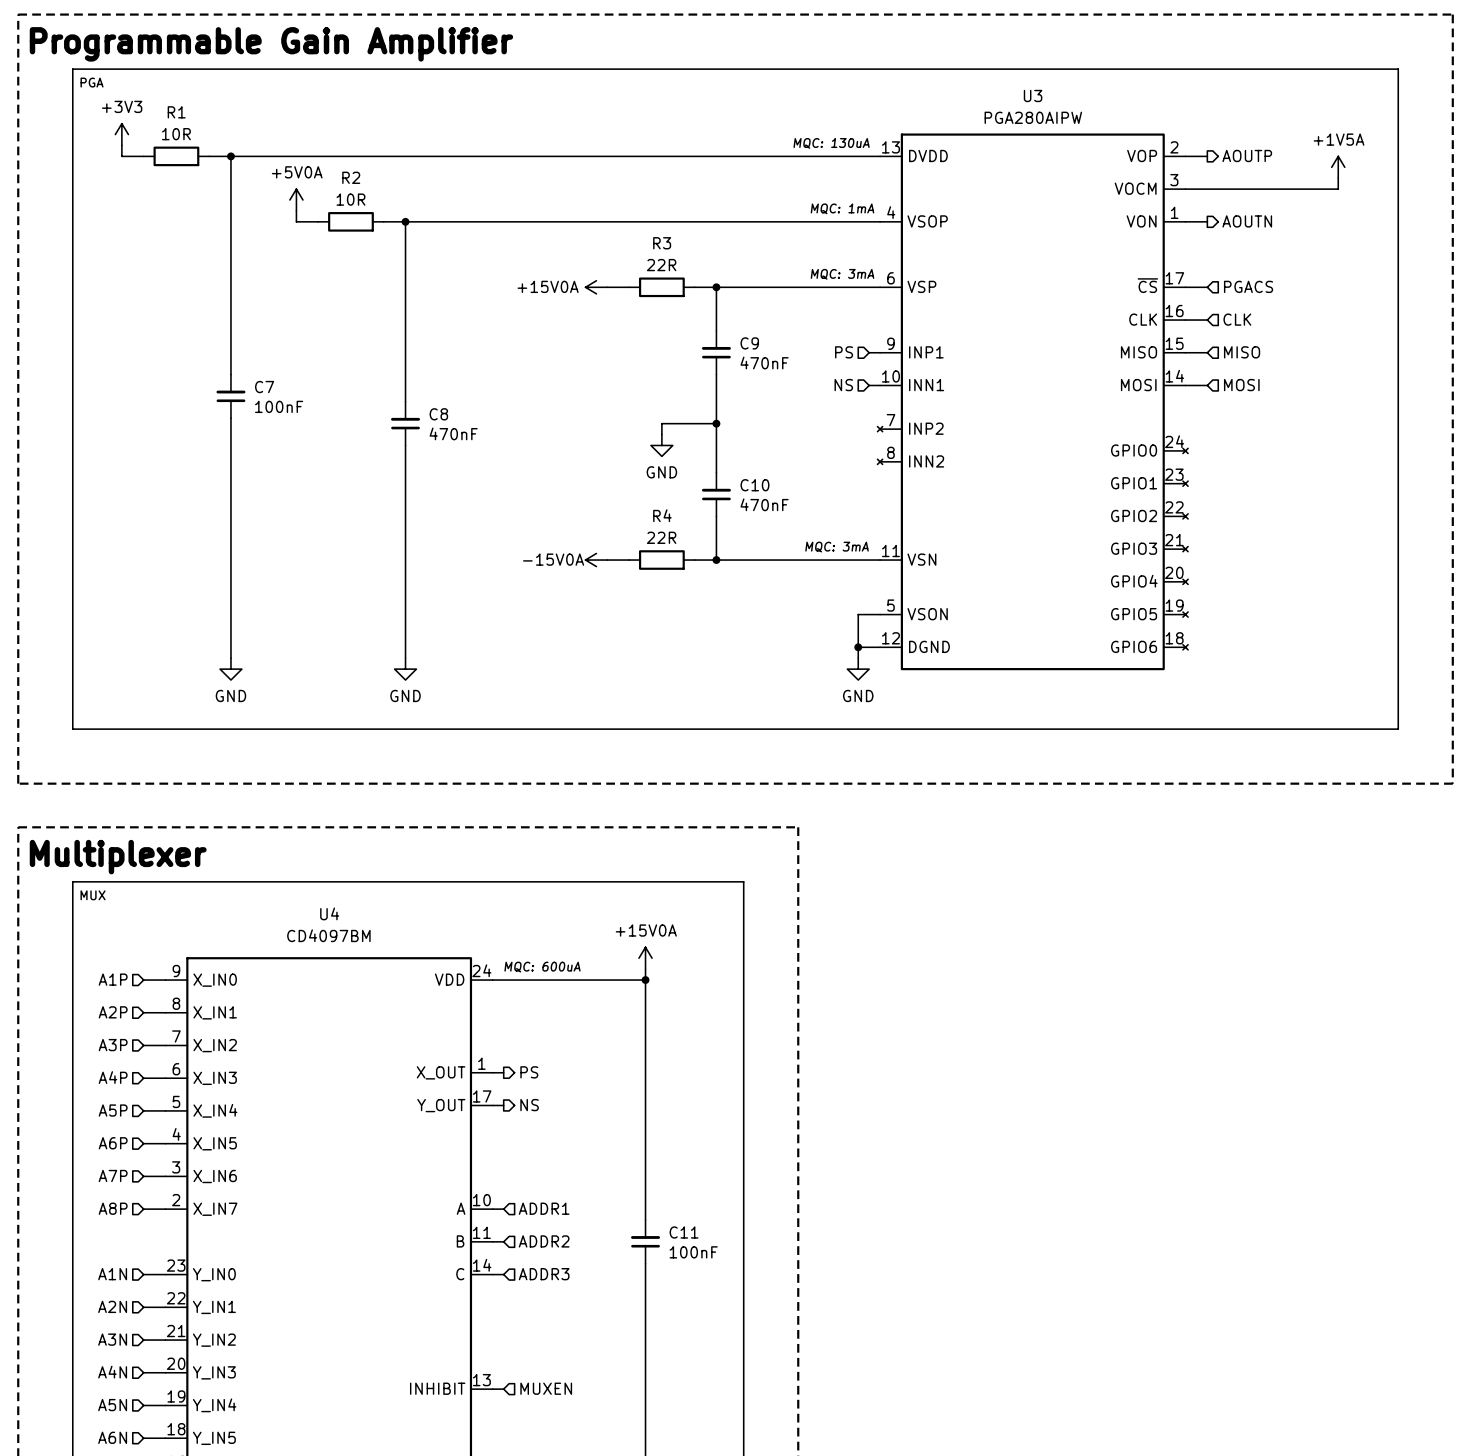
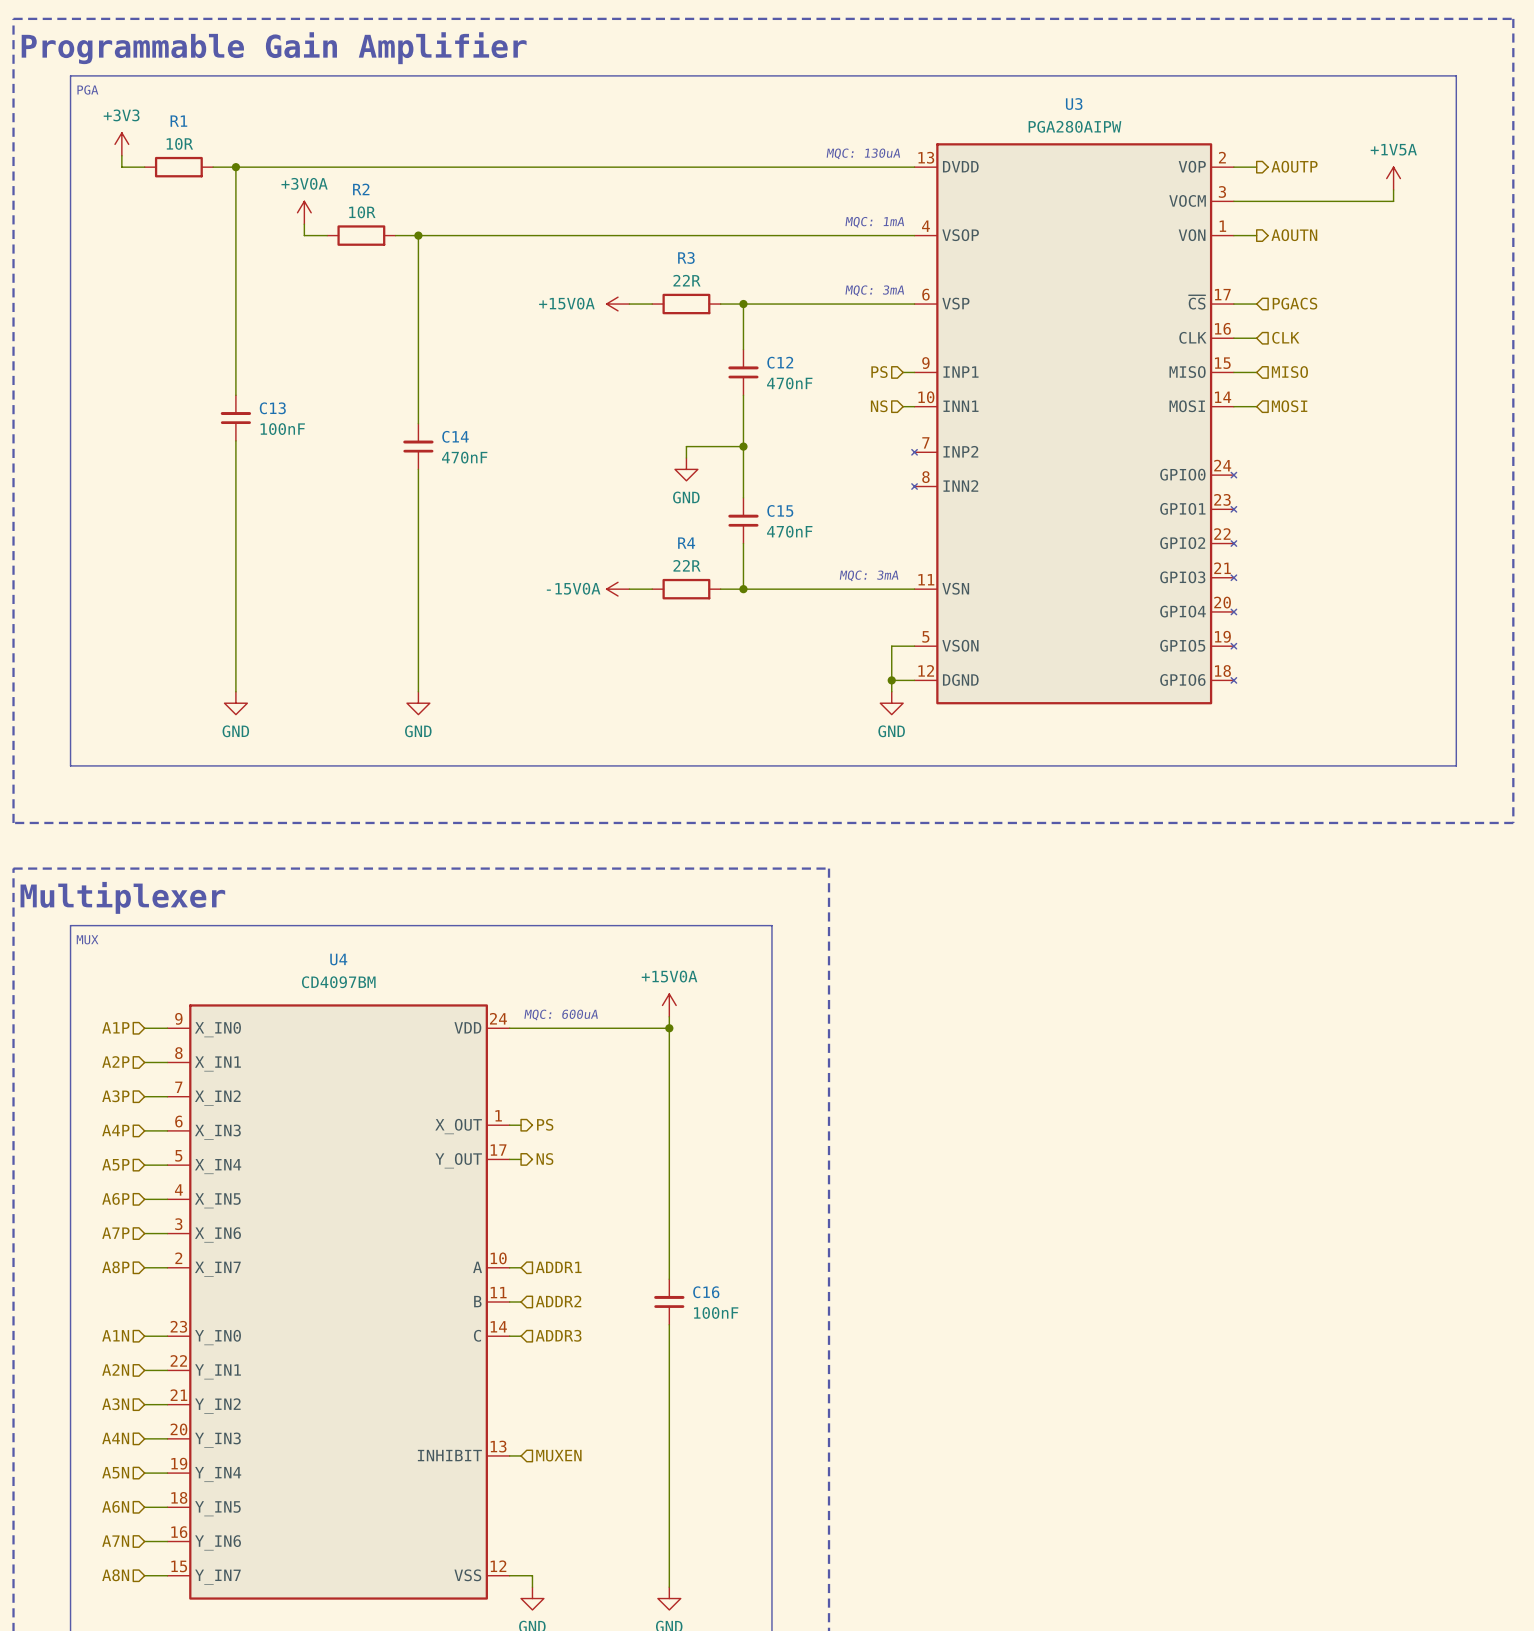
power symbol: +5V0A (296, 200) -> +3V0A (304, 212)
C9 name: C9 (749, 343) -> C12 (780, 362)
C7 name: C7 (264, 387) -> C13 (272, 408)
C8 name: C8 (438, 414) -> C14 (455, 436)
C10 name: C10 (754, 485) -> C15 (780, 510)
C11 name: C11 (684, 1232) -> C16 (706, 1292)

